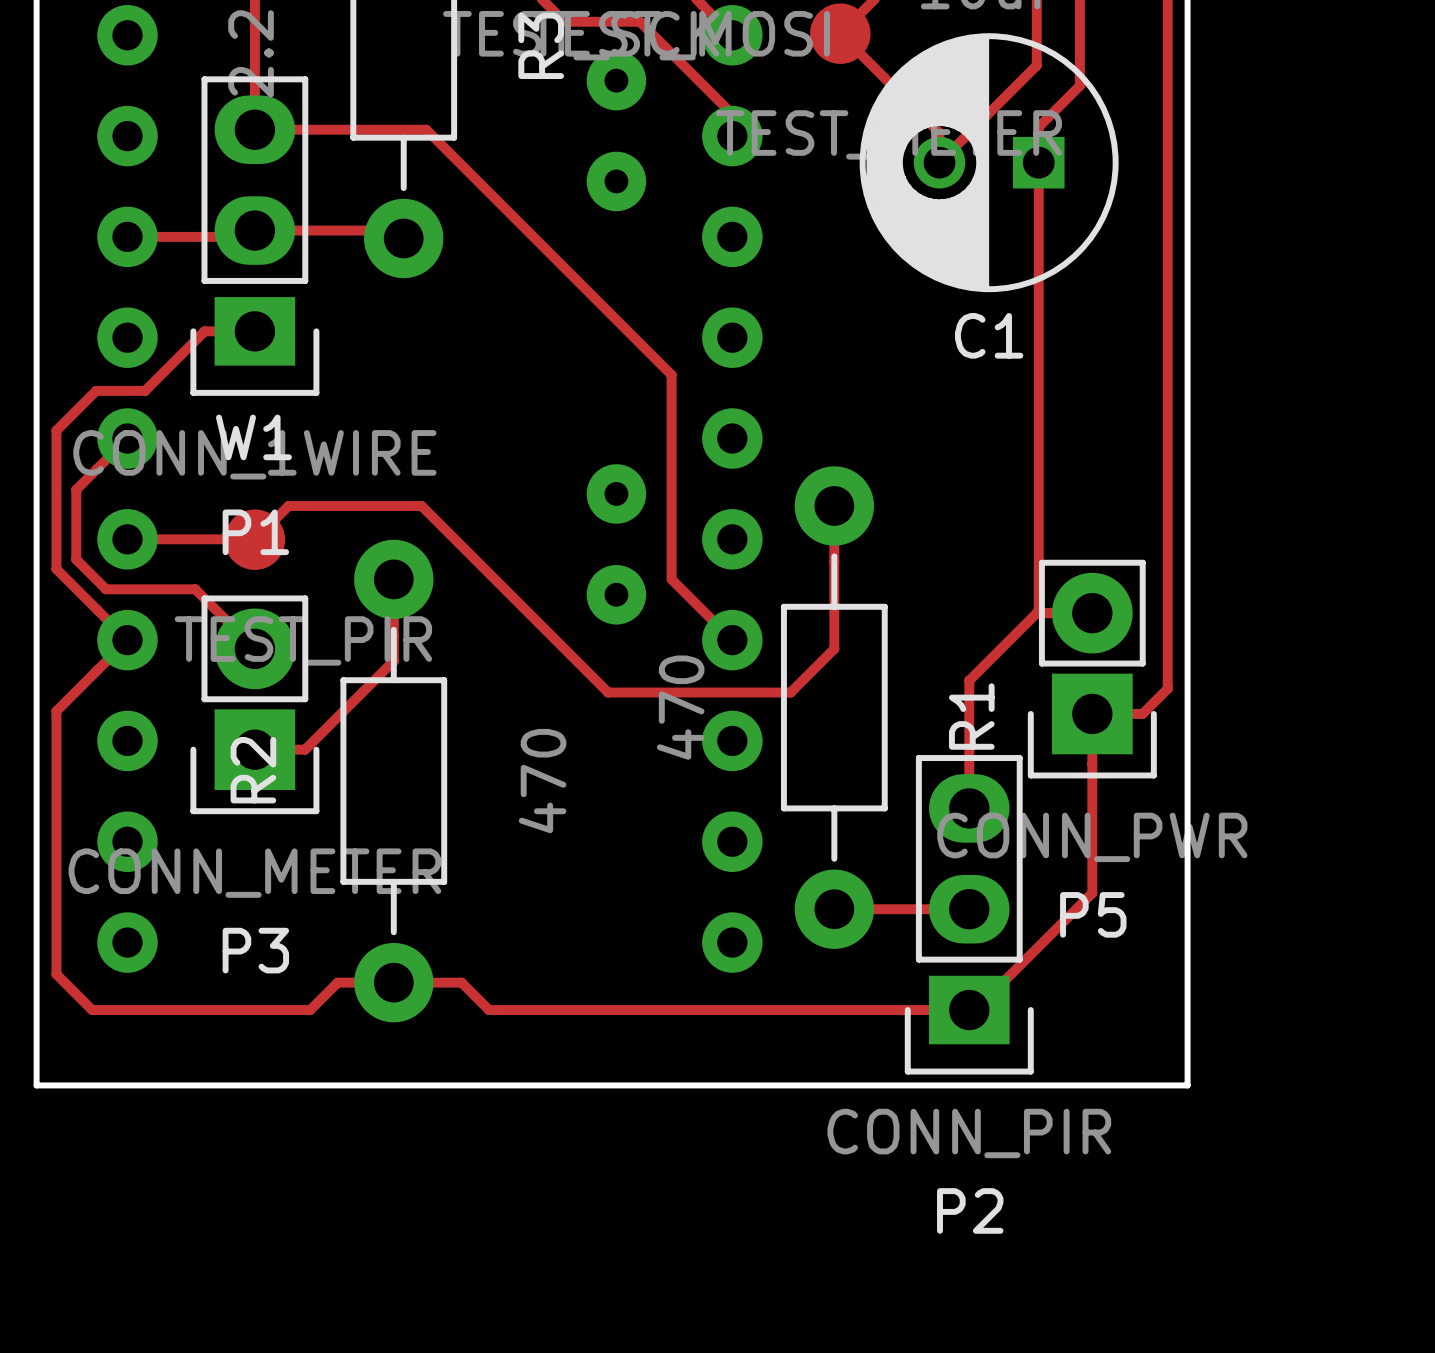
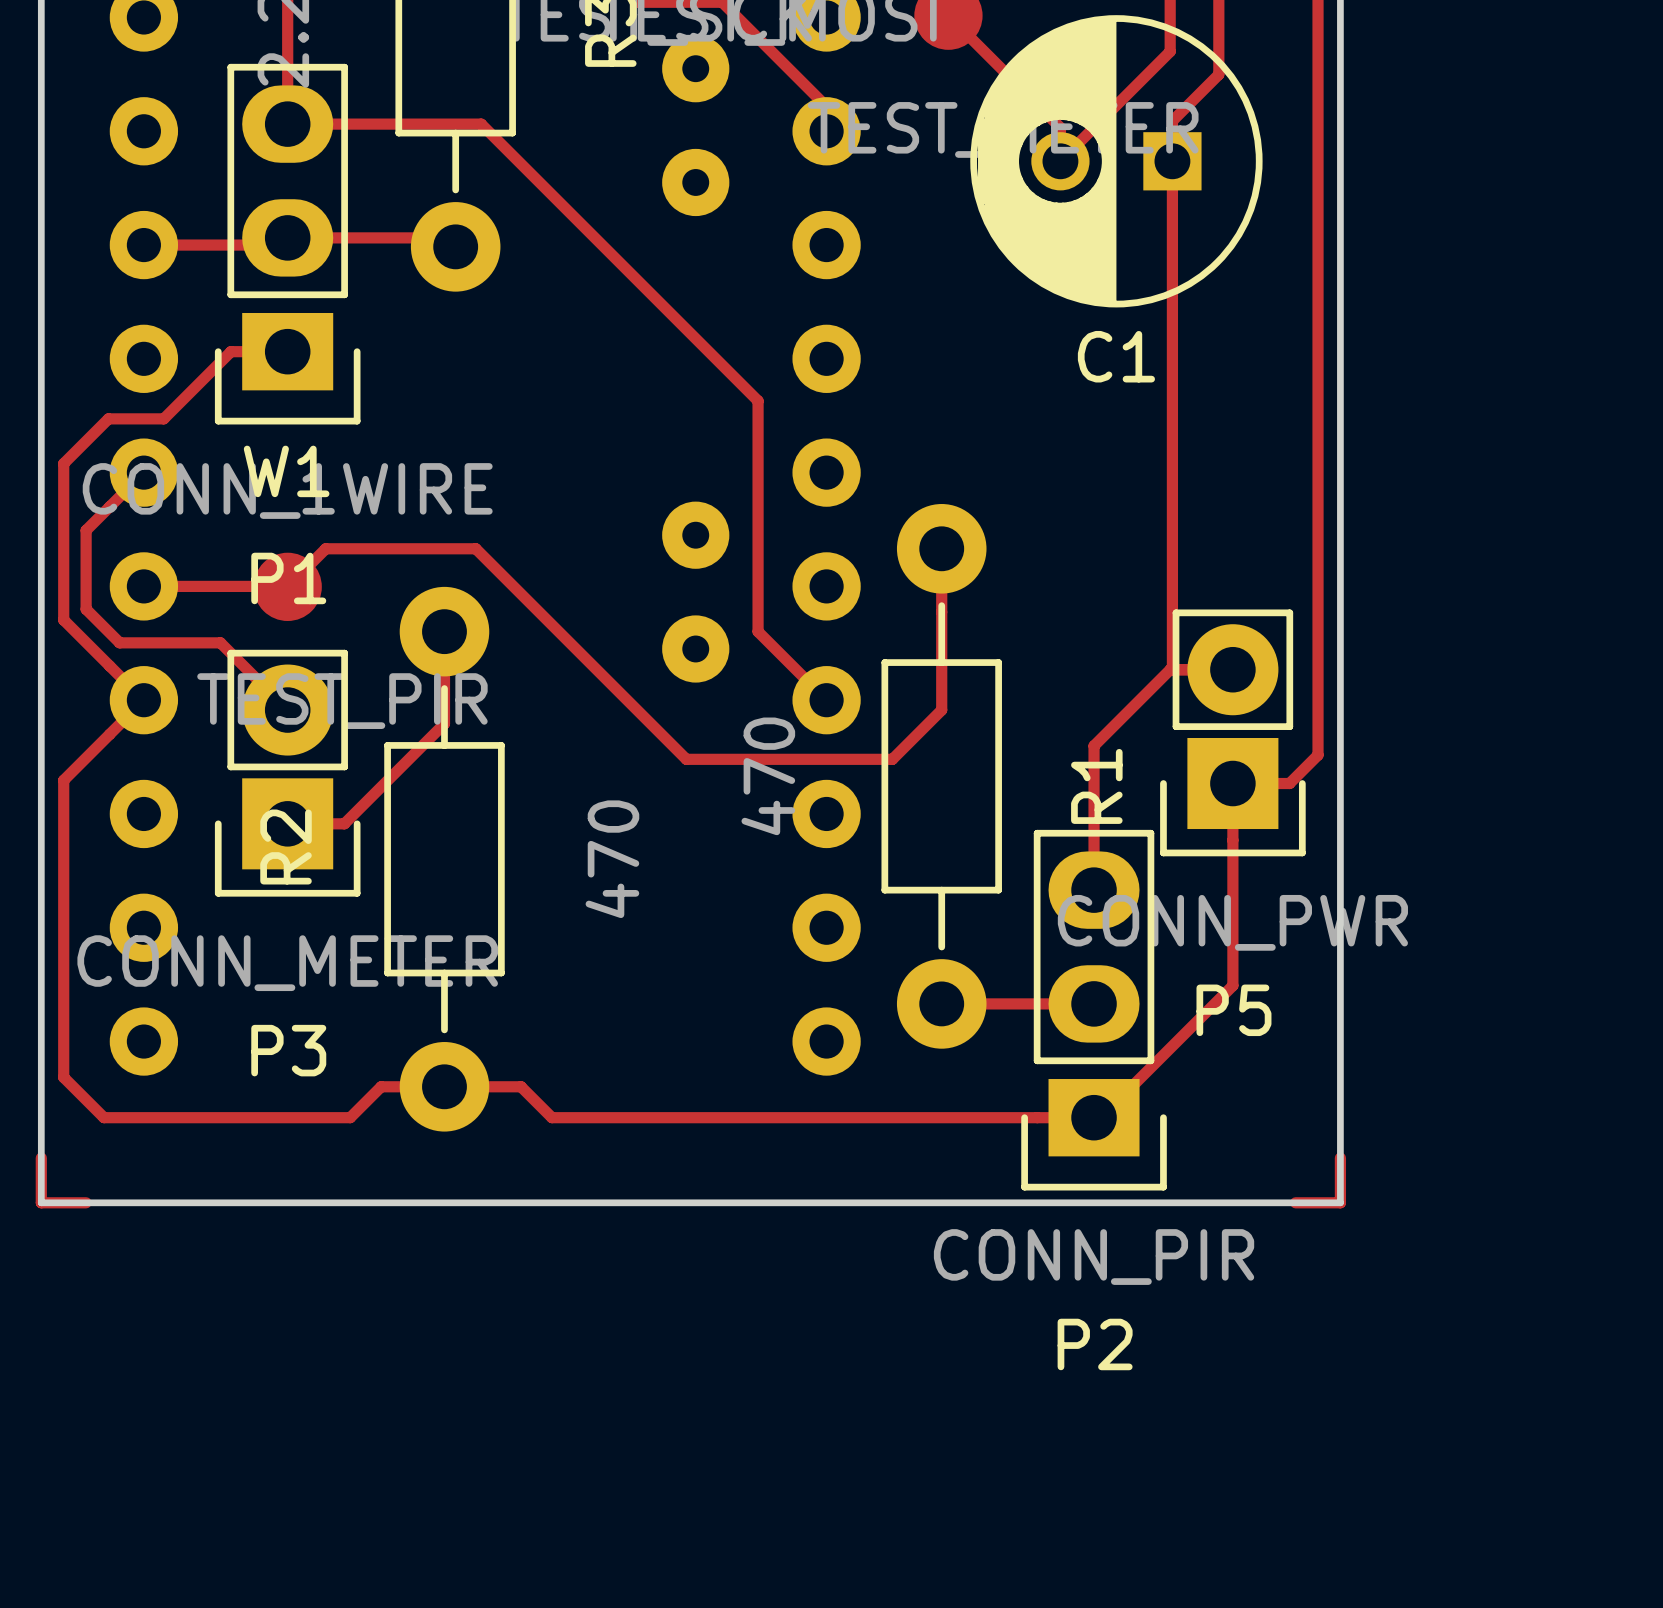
track: none -> (41, 1158) (41, 1202) (86, 1202)
track: none -> (1340, 1158) (1340, 1202) (1295, 1202)

